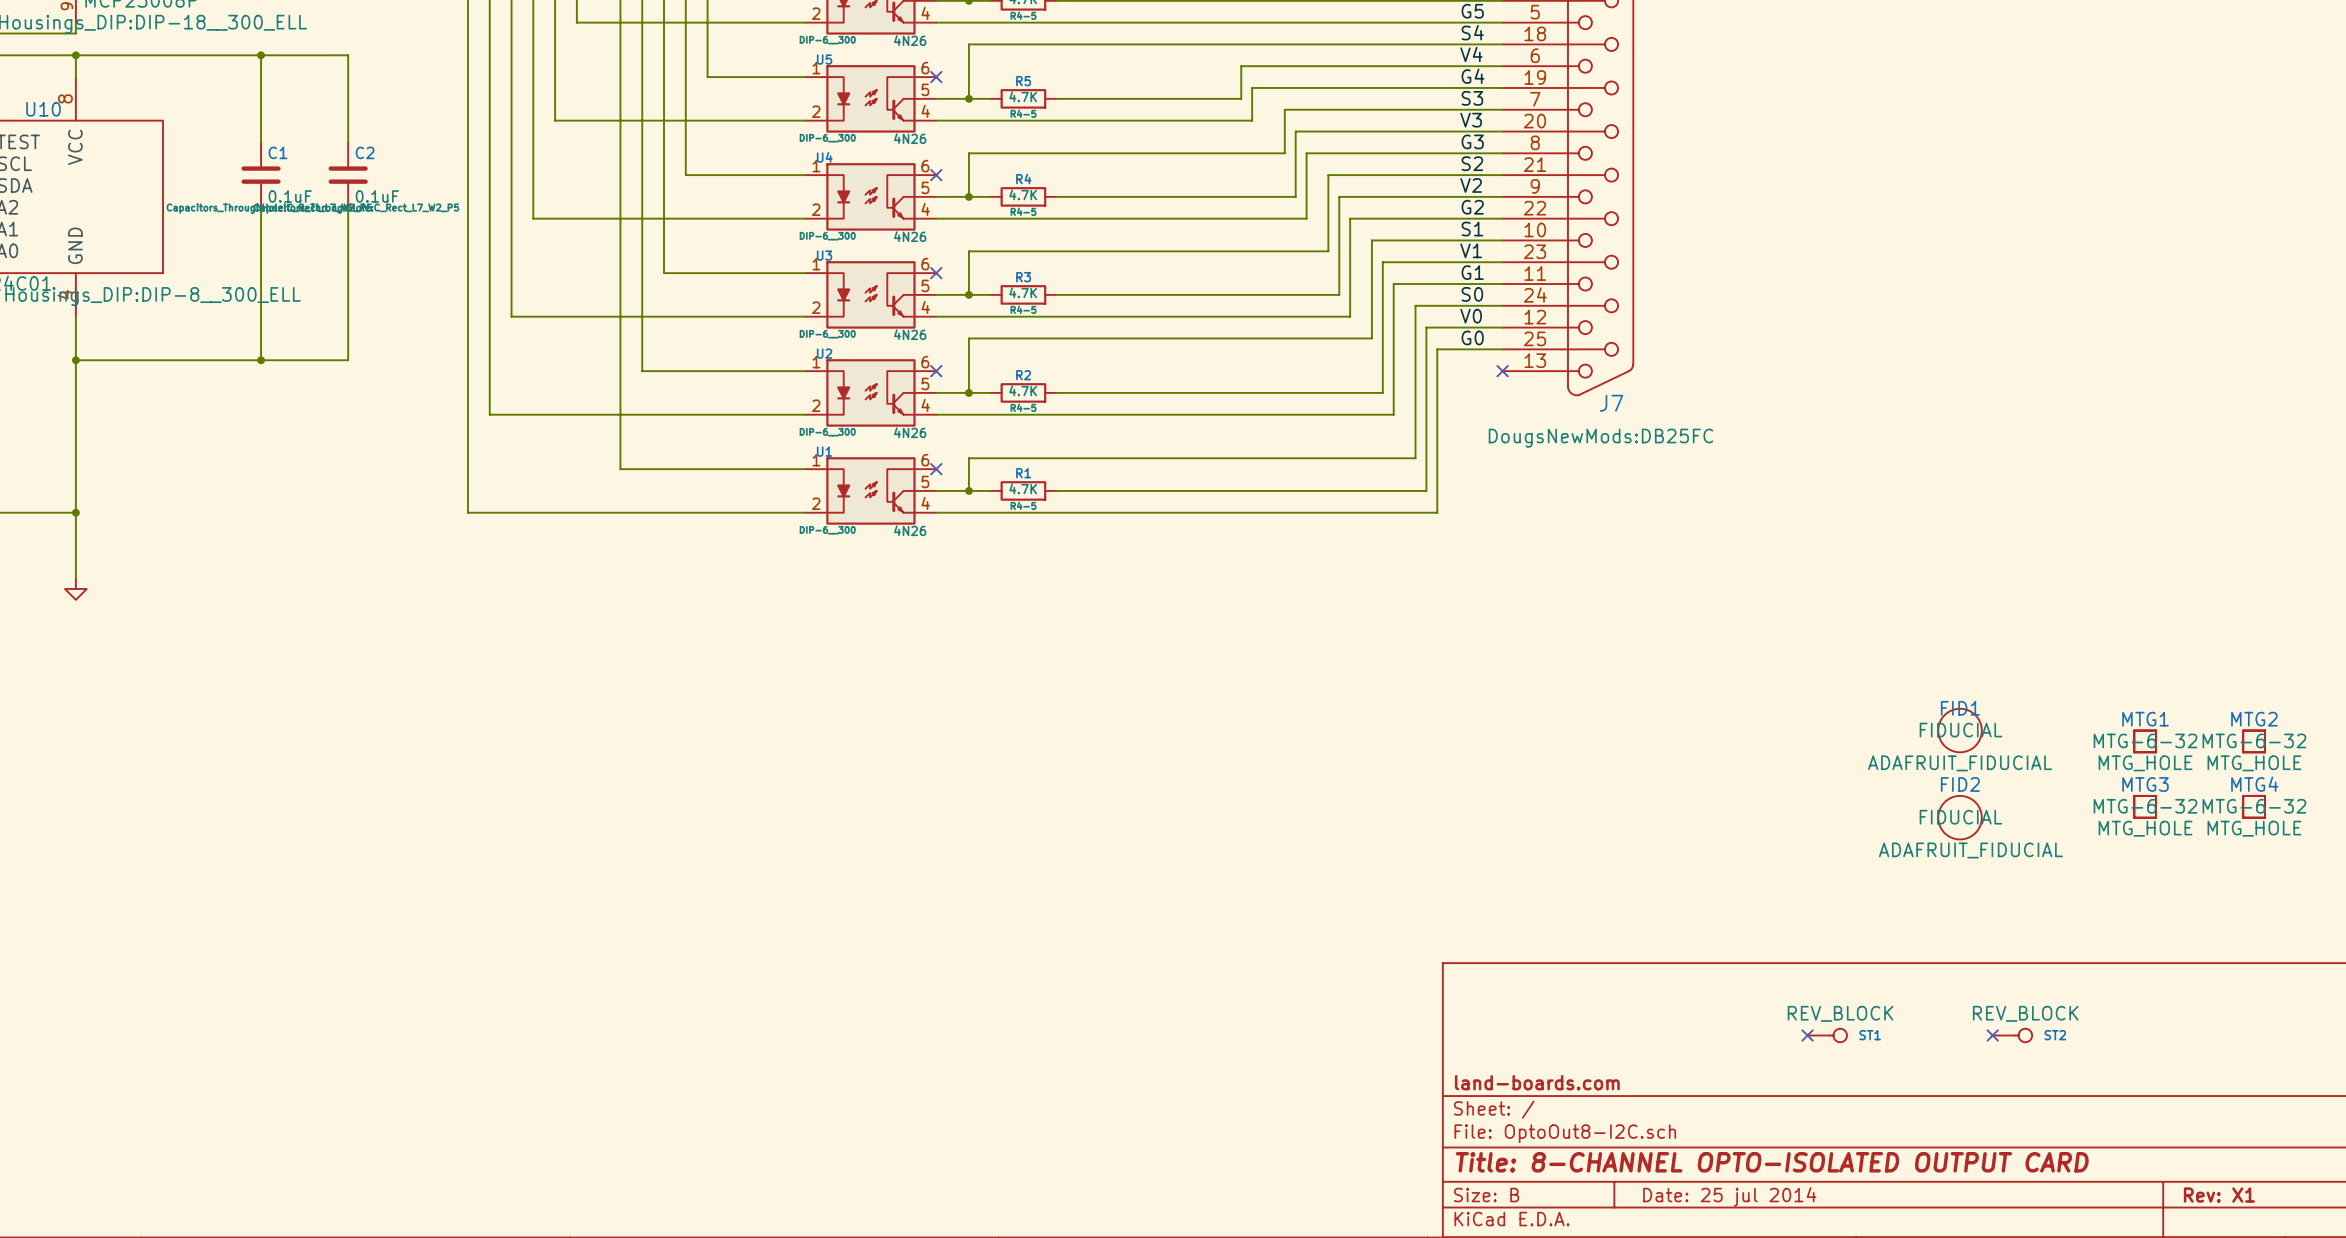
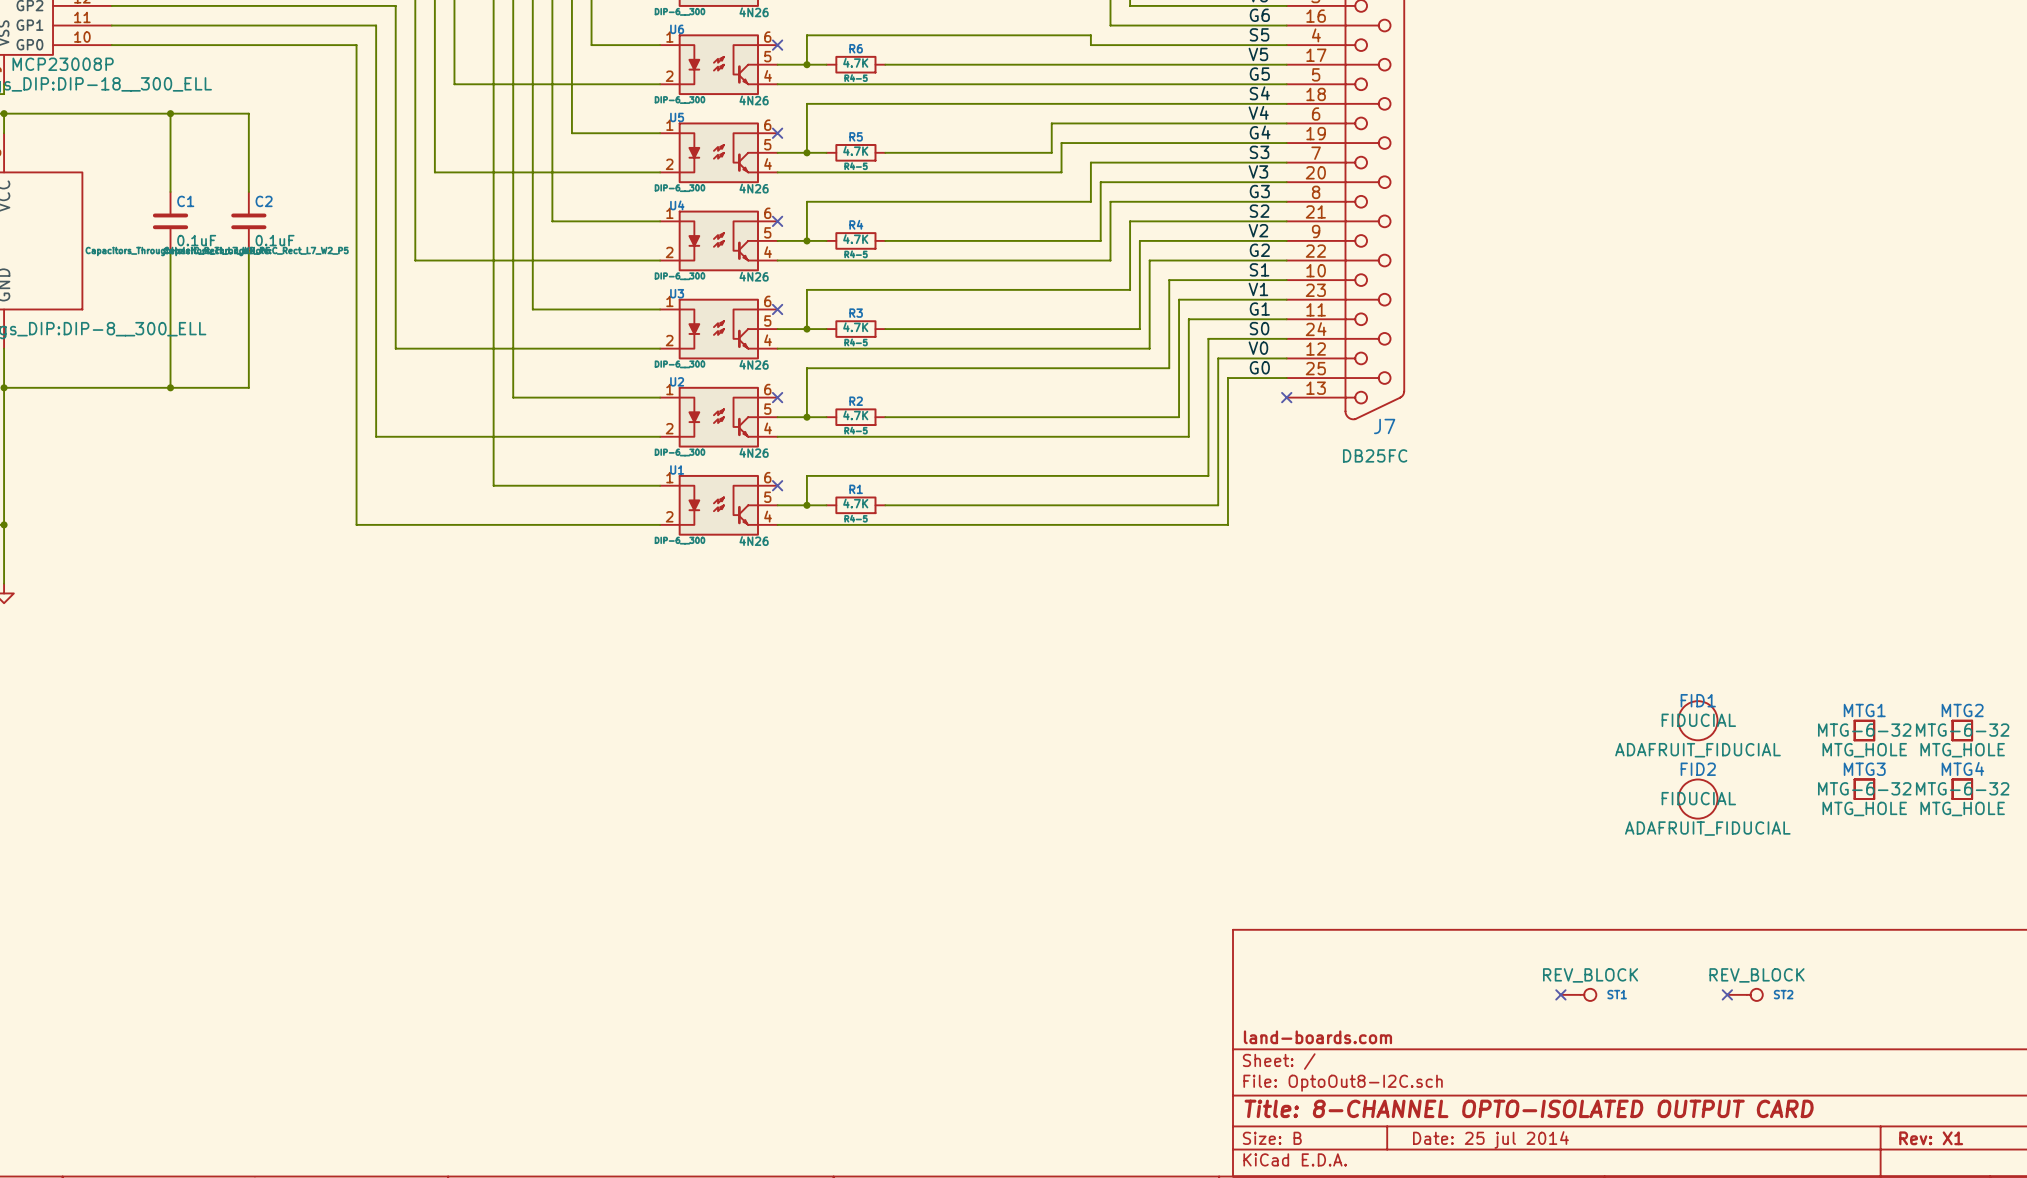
J7 text: DougsNewMods:DB25FC (1600, 438) -> DB25FC (1375, 455)

